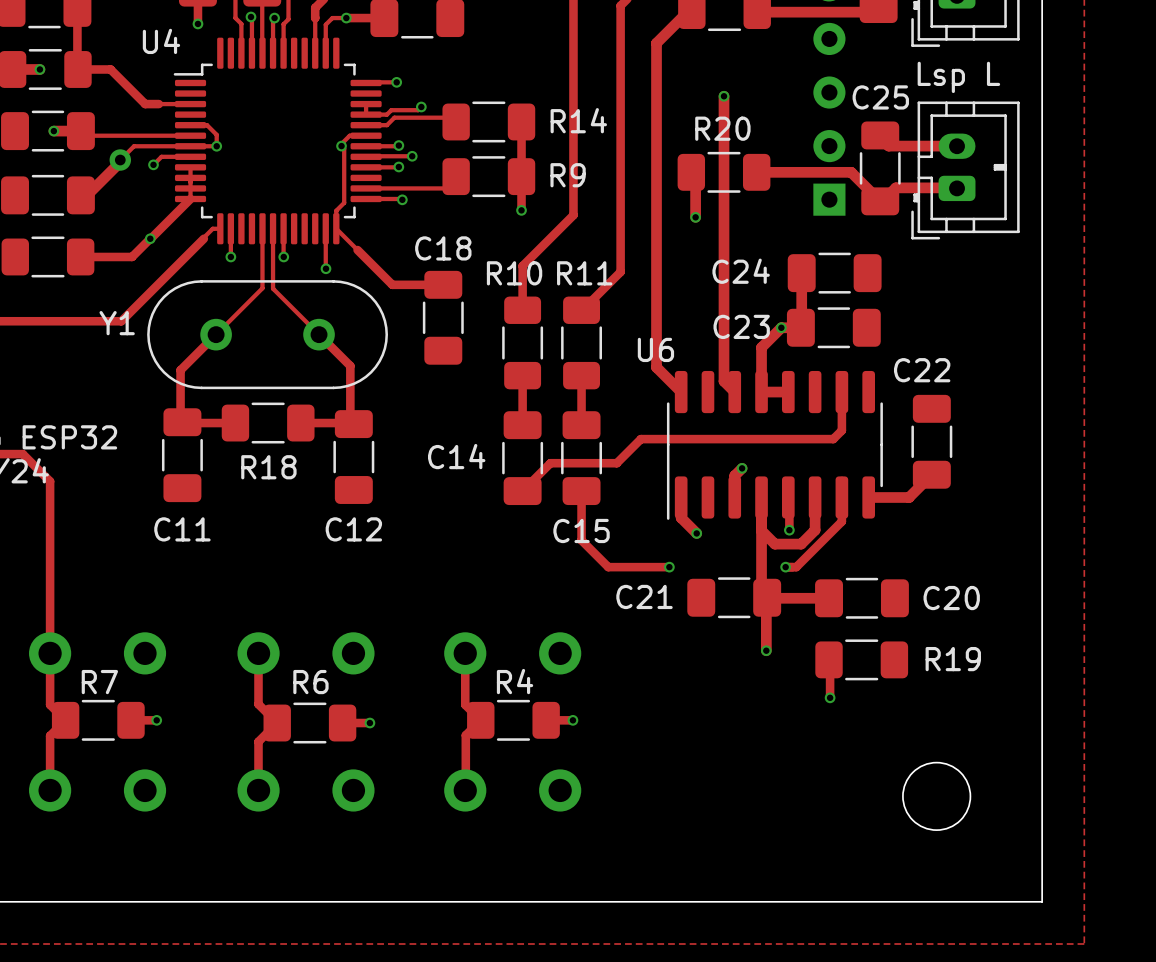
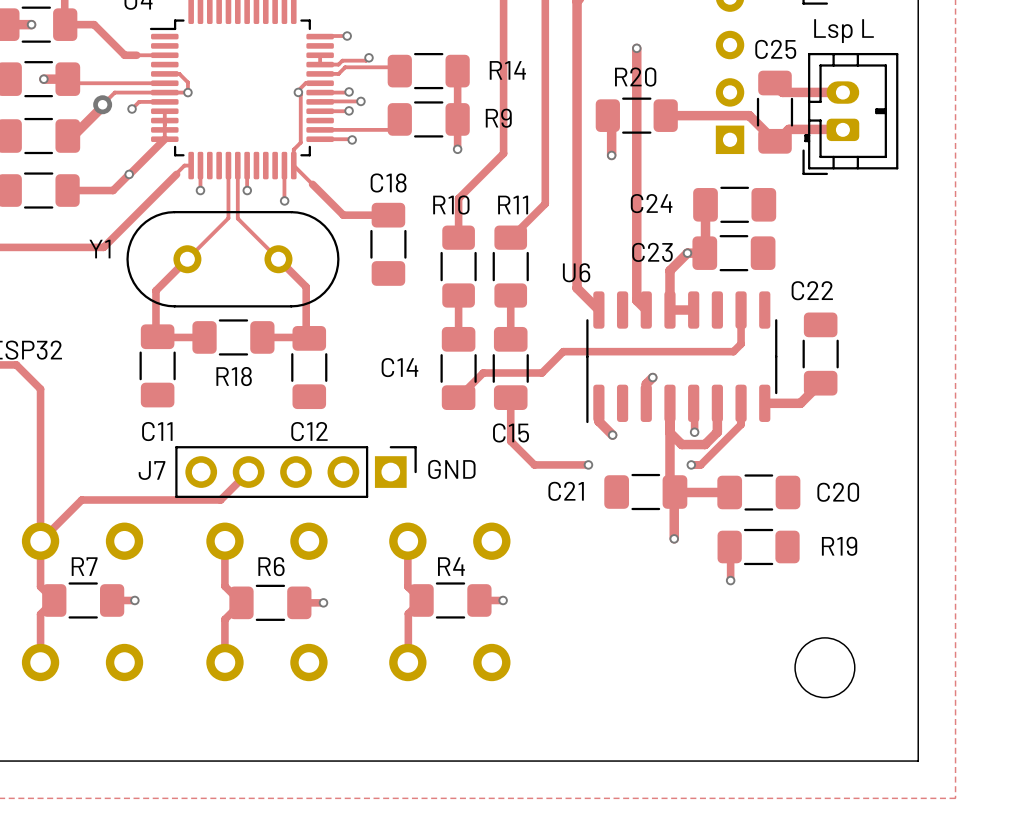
text: none -> GND (451, 469)
track: none -> (248, 472) (220, 500) (81, 500) (40, 541)
J7: none -> (296, 472)

